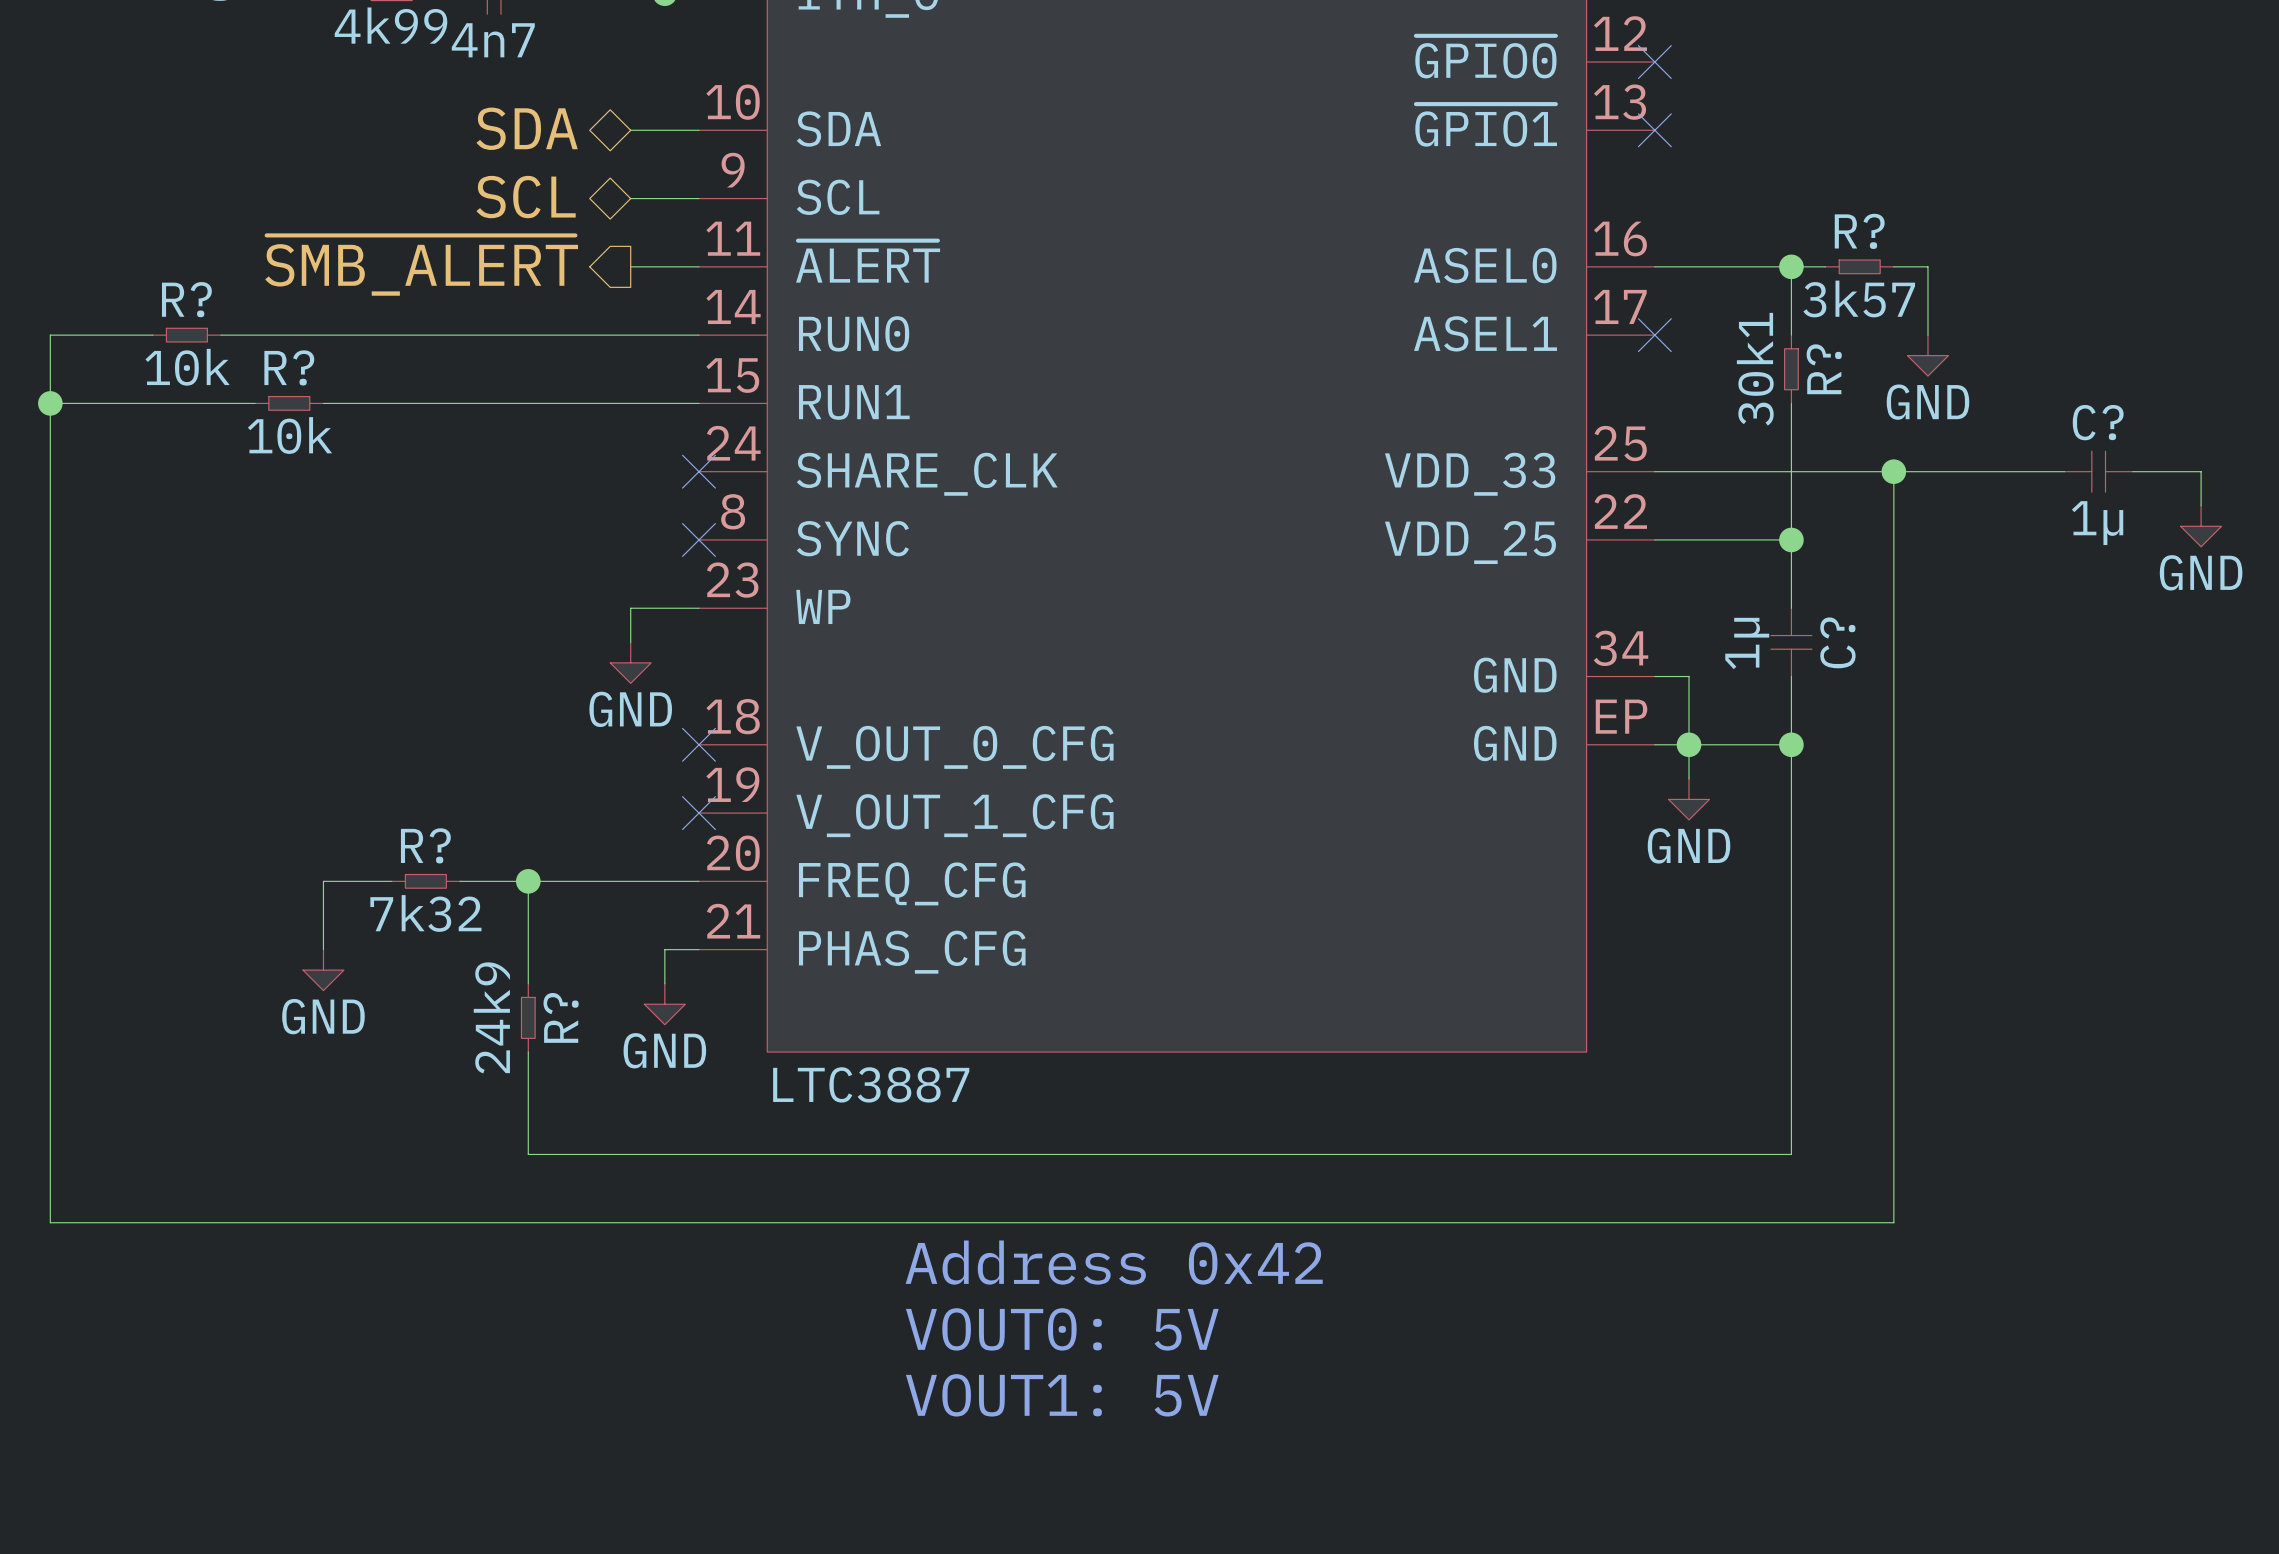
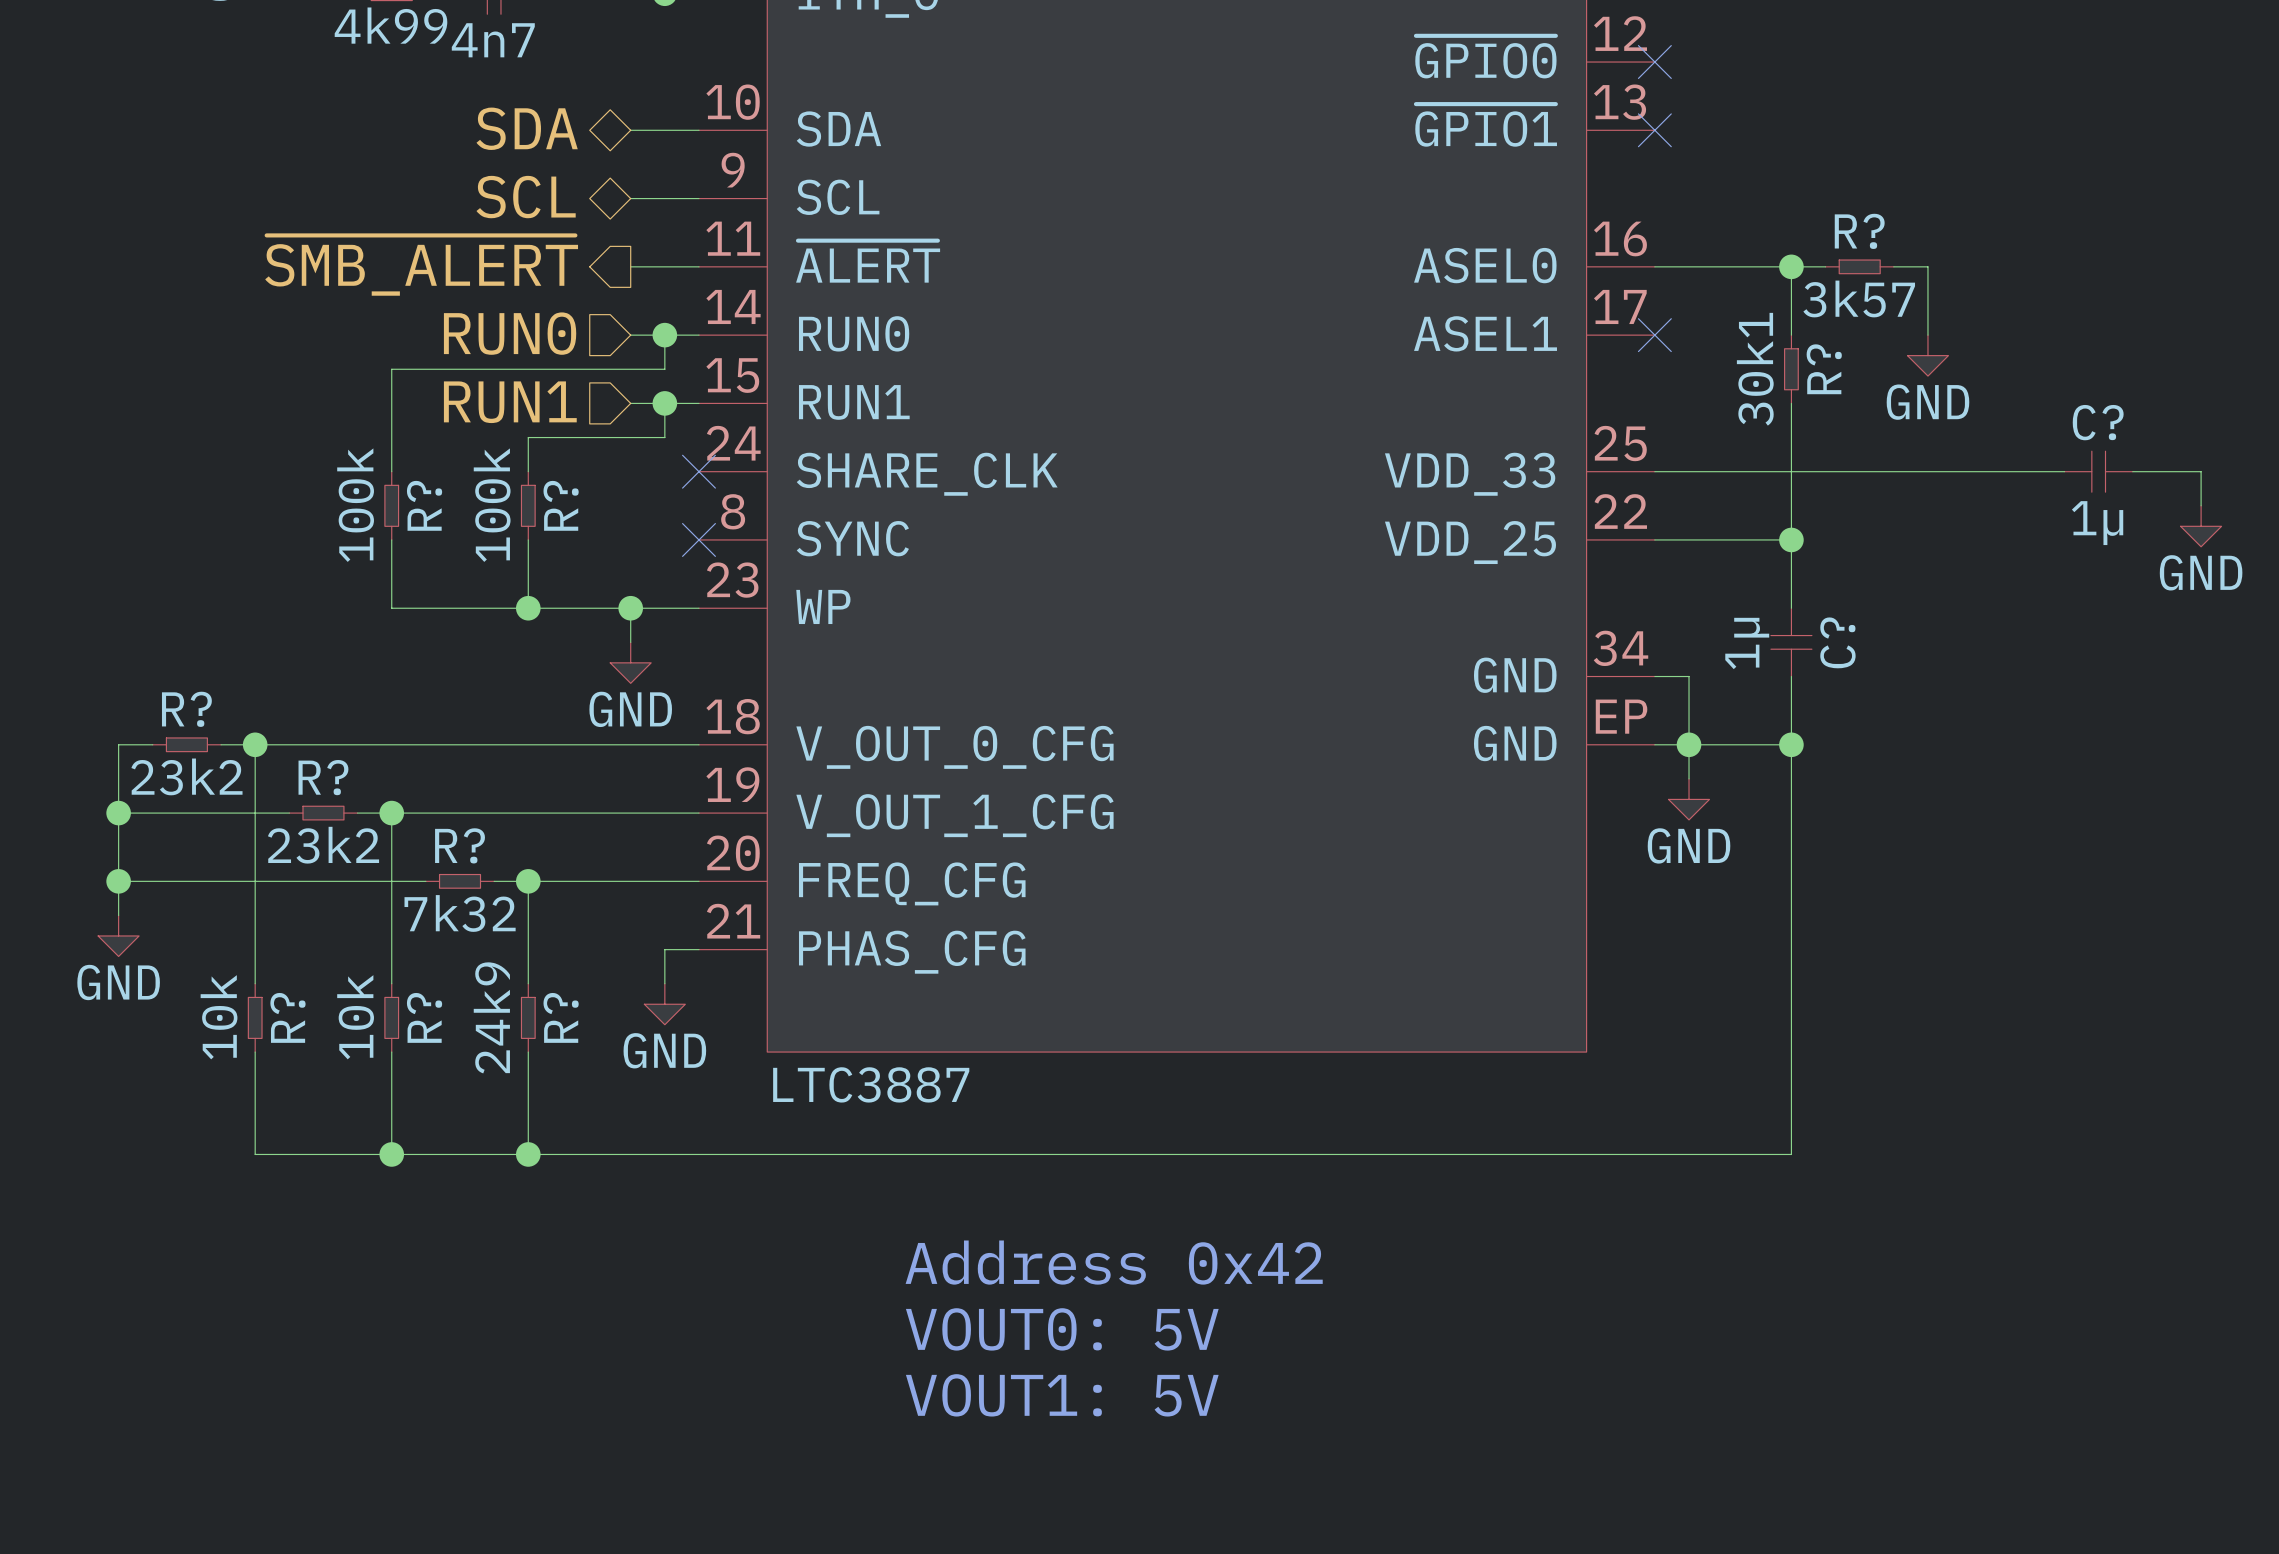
hierarchical label: none -> RUN0 (510, 333)
wire: (152, 335) (50, 335) (50, 1222) (1893, 1222) (1893, 471) -> none
R?: 10k (186, 335) -> none
wire: (221, 335) (630, 335) -> none
wire: none -> (664, 335) (664, 369) (391, 369) (391, 471)
junction: none -> (664, 335)
hierarchical label: none -> RUN1 (510, 402)
wire: (50, 403) (255, 403) -> none
junction: (50, 403) -> none
R?: 10k (289, 403) -> none
wire: (323, 403) (630, 403) -> none
wire: none -> (664, 403) (664, 437) (528, 437) (528, 471)
junction: none -> (664, 403)
junction: (1893, 471) -> none
R?: none -> 100k (391, 505)
R?: none -> 100k (528, 505)
wire: none -> (391, 539) (391, 608) (630, 608)
wire: none -> (528, 539) (528, 608)
junction: none -> (528, 608)
junction: none -> (630, 608)
wire: none -> (152, 744) (118, 744) (118, 915)
R?: none -> 23k2 (186, 744)
wire: none -> (221, 744) (698, 744)
wire: none -> (255, 744) (255, 983)
junction: none -> (255, 744)
no-connect mark: (698, 744) -> none
wire: none -> (118, 813) (289, 813)
junction: none -> (118, 813)
R?: none -> 23k2 (323, 813)
wire: none -> (357, 813) (698, 813)
wire: none -> (391, 813) (391, 983)
junction: none -> (391, 813)
no-connect mark: (698, 813) -> none
junction: none -> (118, 881)
wire: (323, 881) (323, 949) -> (323, 881) (118, 881)
R? position: (425, 881) -> (460, 881)
power symbol position: GND (323, 970) -> GND (118, 935)
R?: none -> 10k (255, 1017)
R?: none -> 10k (391, 1017)
wire: none -> (255, 1052) (255, 1154) (528, 1154)
wire: none -> (391, 1052) (391, 1154)
junction: none -> (391, 1154)
junction: none -> (528, 1154)

